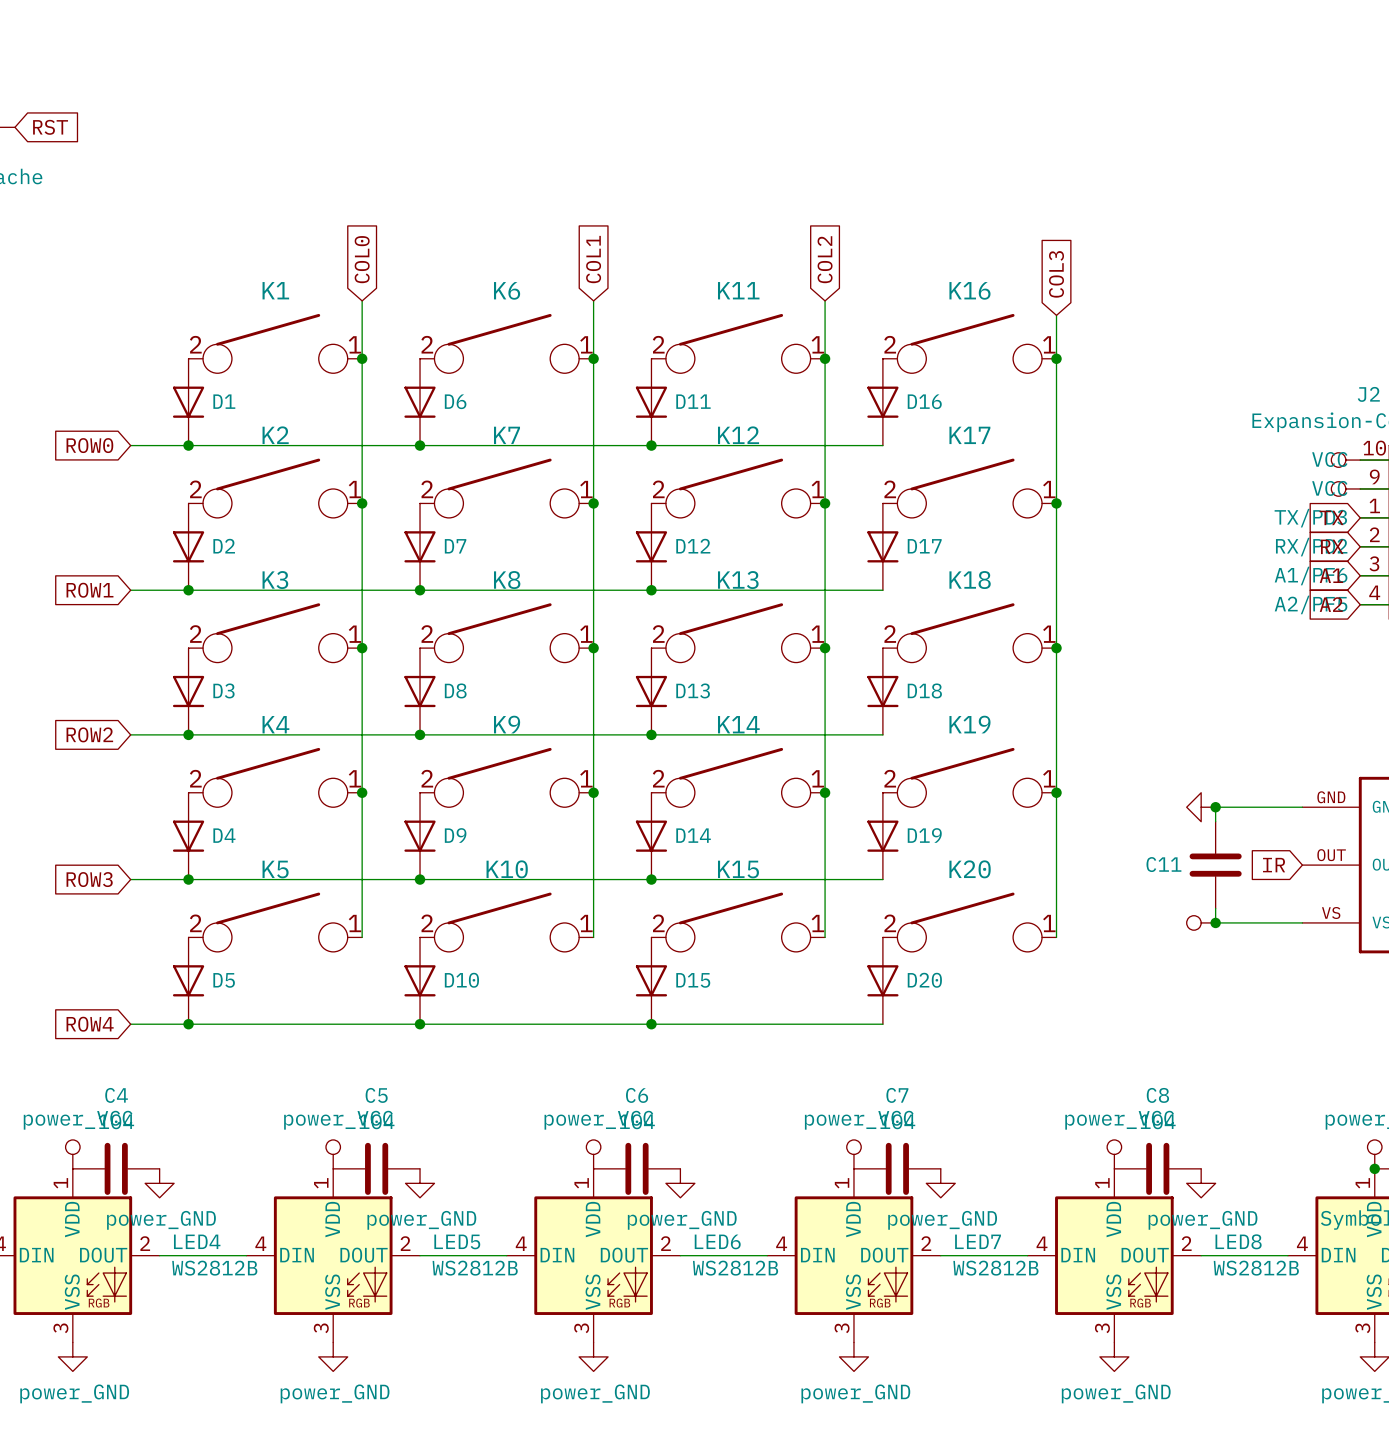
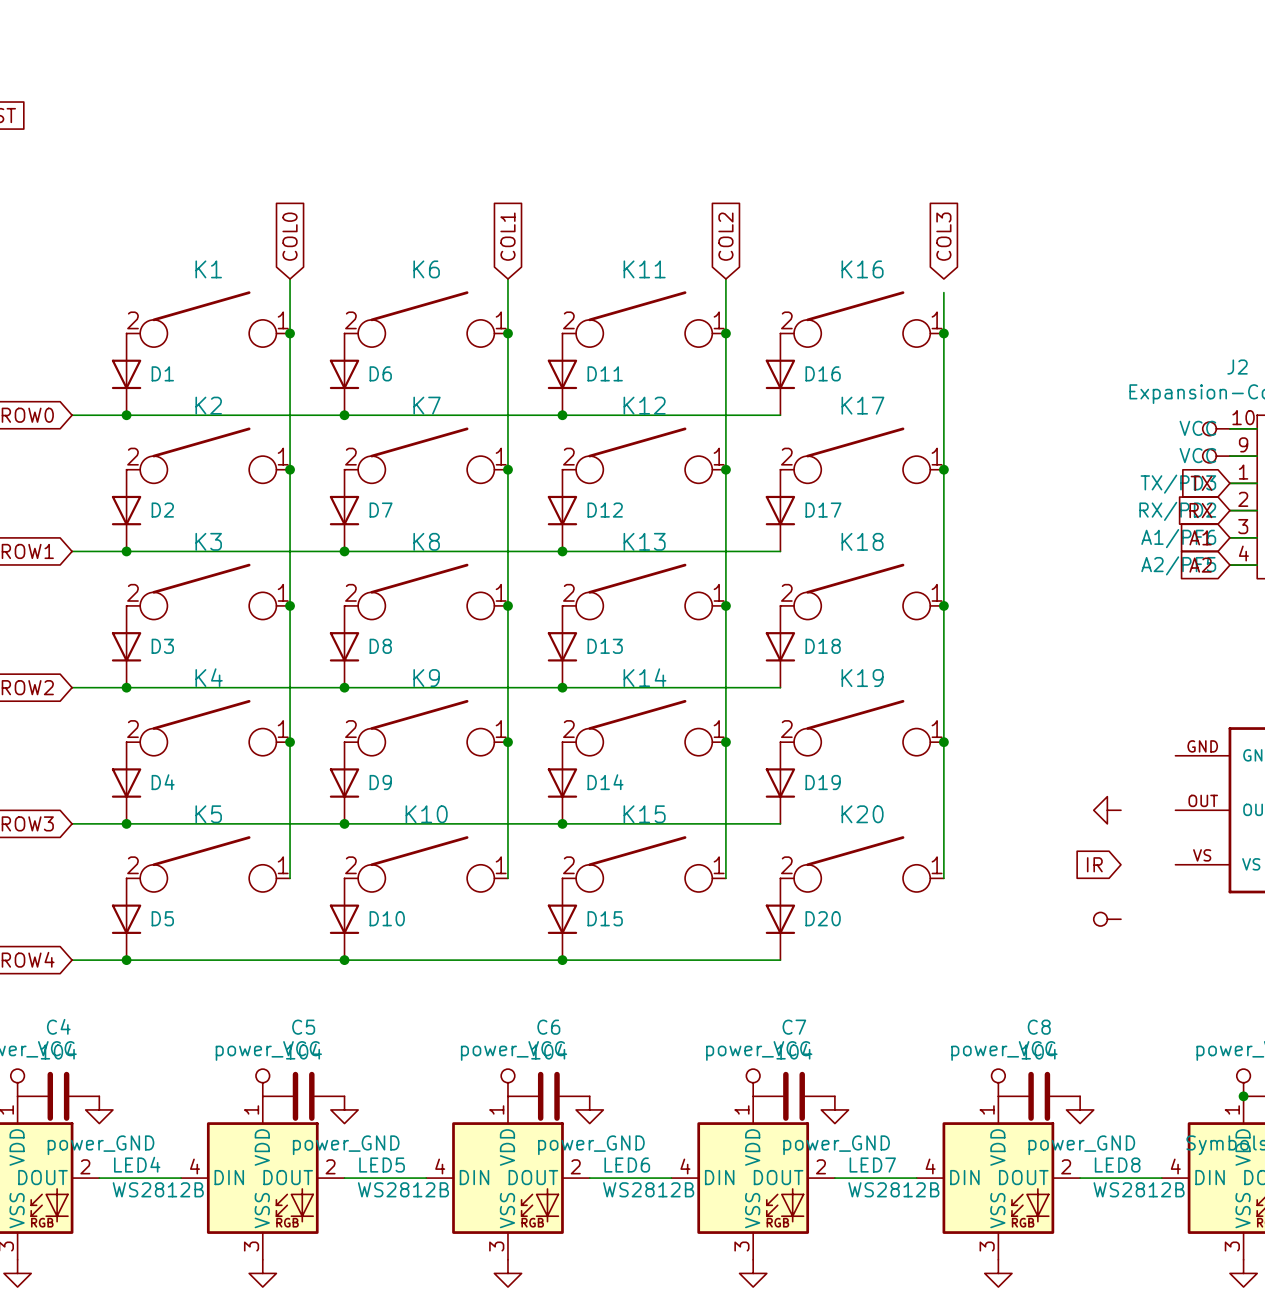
global label position: COL3 (1056, 274) -> COL3 (943, 236)
power symbol position: (1201, 807) -> (1107, 810)
junction: (1215, 807) -> none
wire: (1302, 807) (1215, 807) (1215, 821) -> none
C11: (1215, 865) -> none
global label position: IR (1274, 865) -> IR (1094, 864)
wire: (1215, 908) (1215, 922) (1302, 922) -> none
power symbol position: (1201, 922) -> (1107, 919)
junction: (1215, 922) -> none

